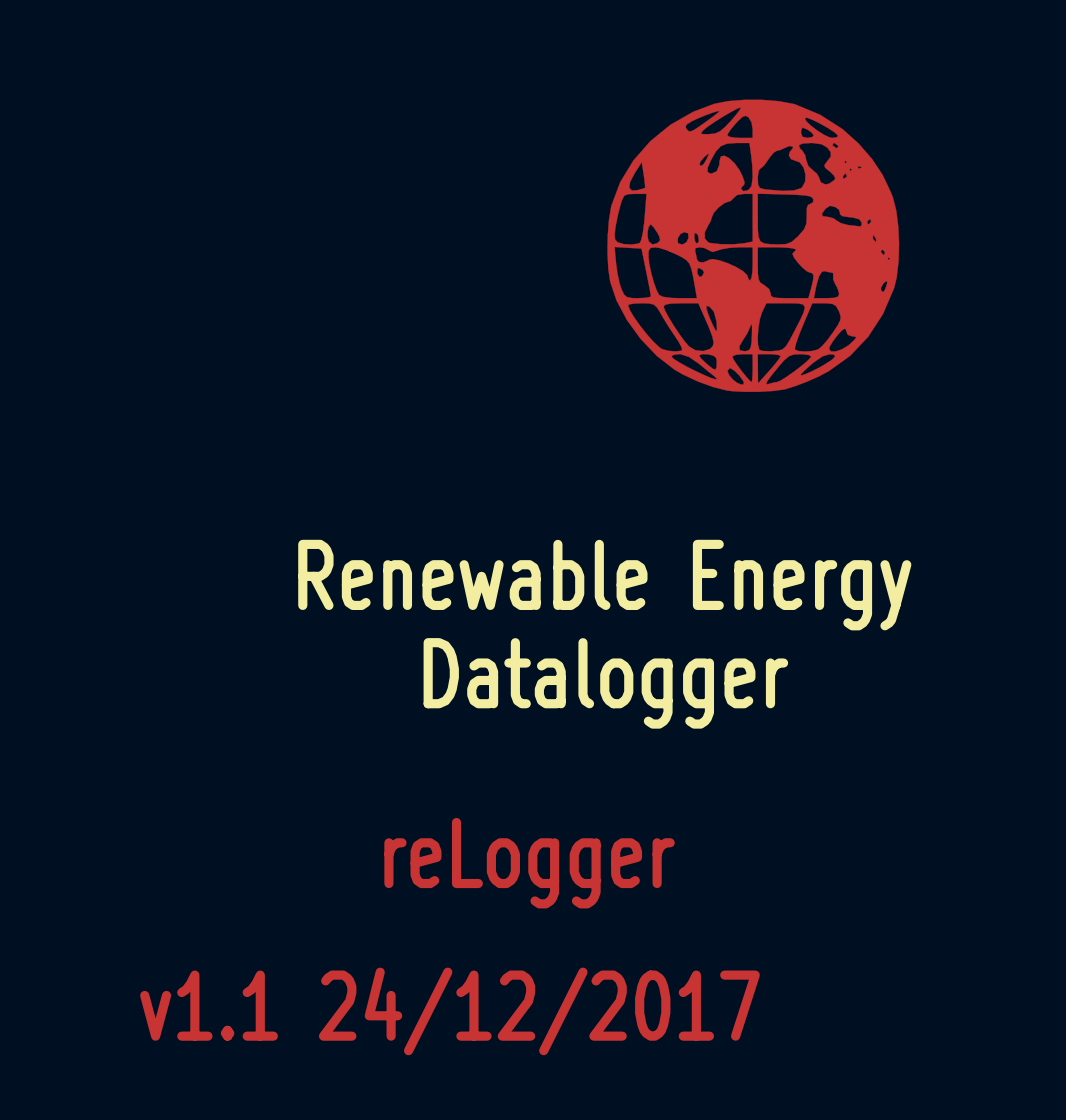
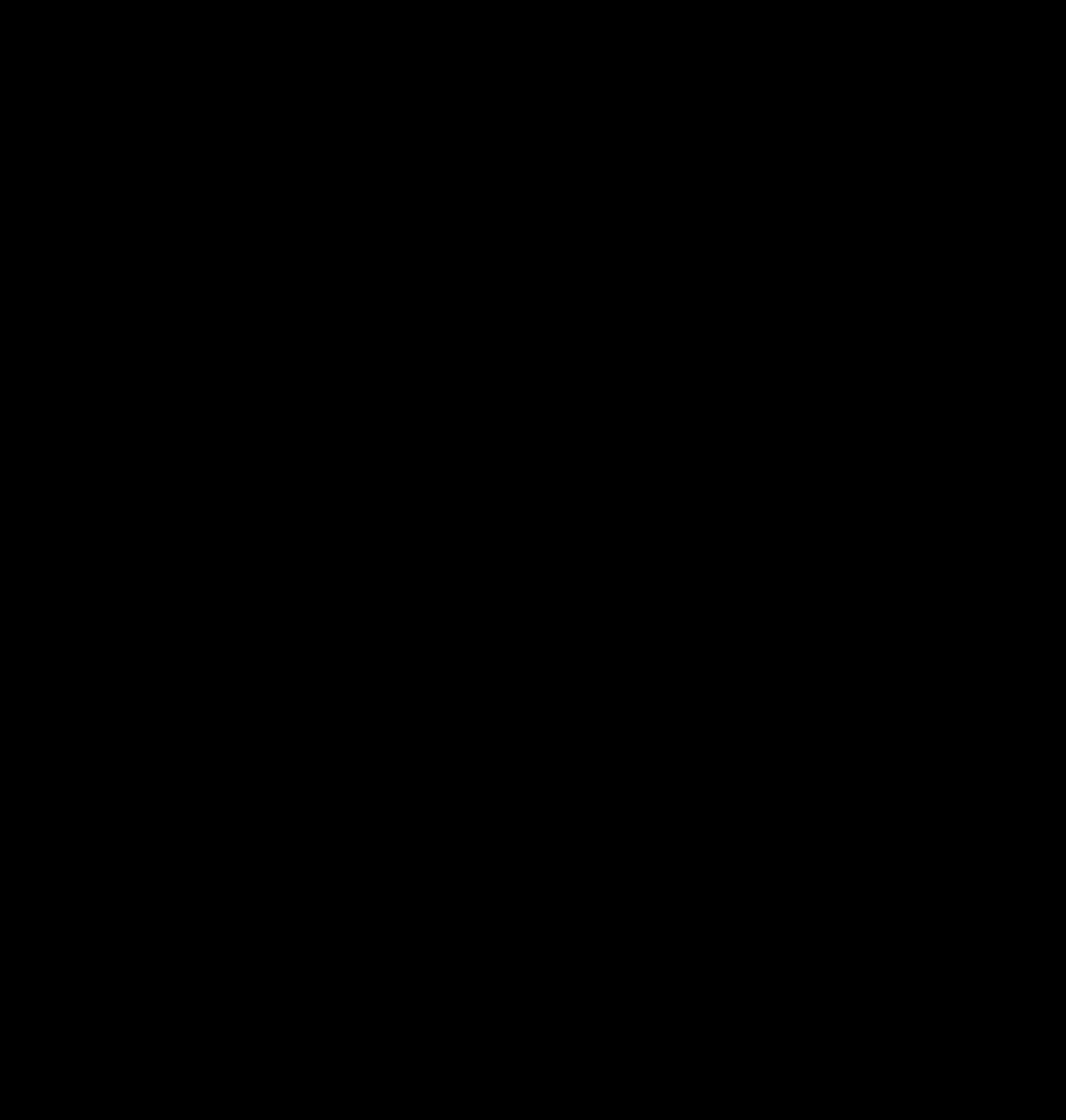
part: (753, 245) -> none
text: Renewable Energy (604, 585) -> none
text: Datalogger (605, 683) -> none
text: reLogger (529, 863) -> none
text: v1.1 24/12/2017 (449, 1011) -> none

